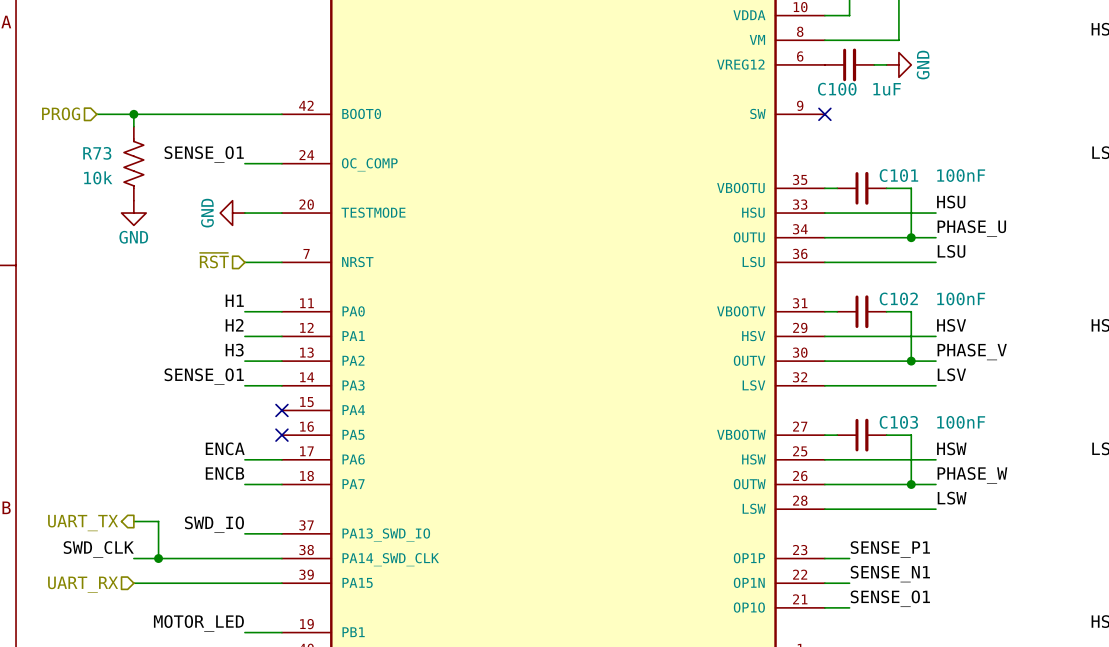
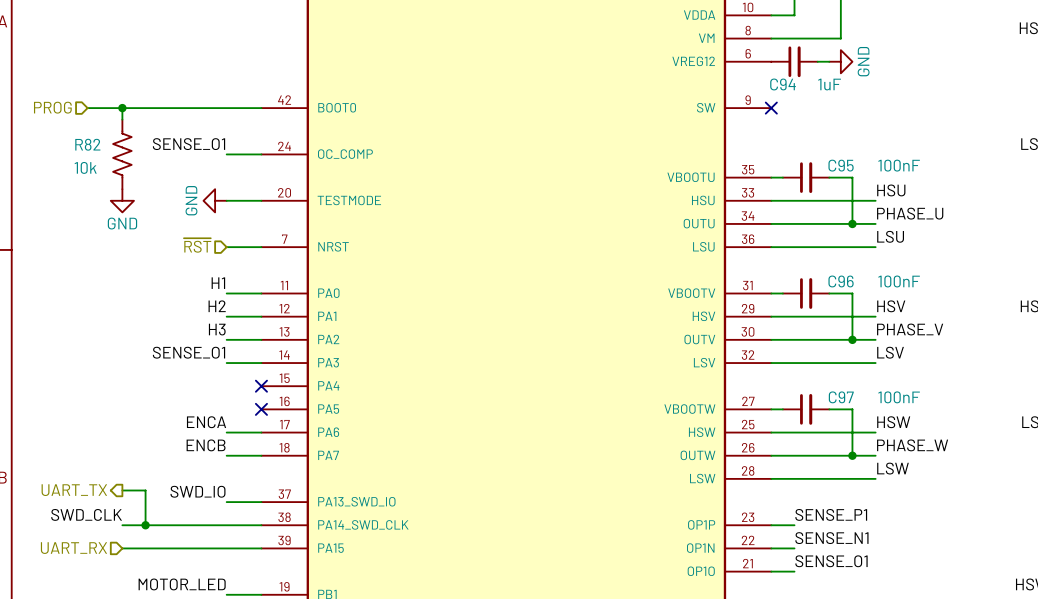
C100 name: C100 (837, 89) -> C94 (783, 84)
R73 name: R73 (97, 153) -> R82 (87, 144)
C101 name: C101 (898, 175) -> C95 (841, 165)
C102 name: C102 (898, 298) -> C96 (841, 281)
C103 name: C103 (898, 422) -> C97 (841, 397)

